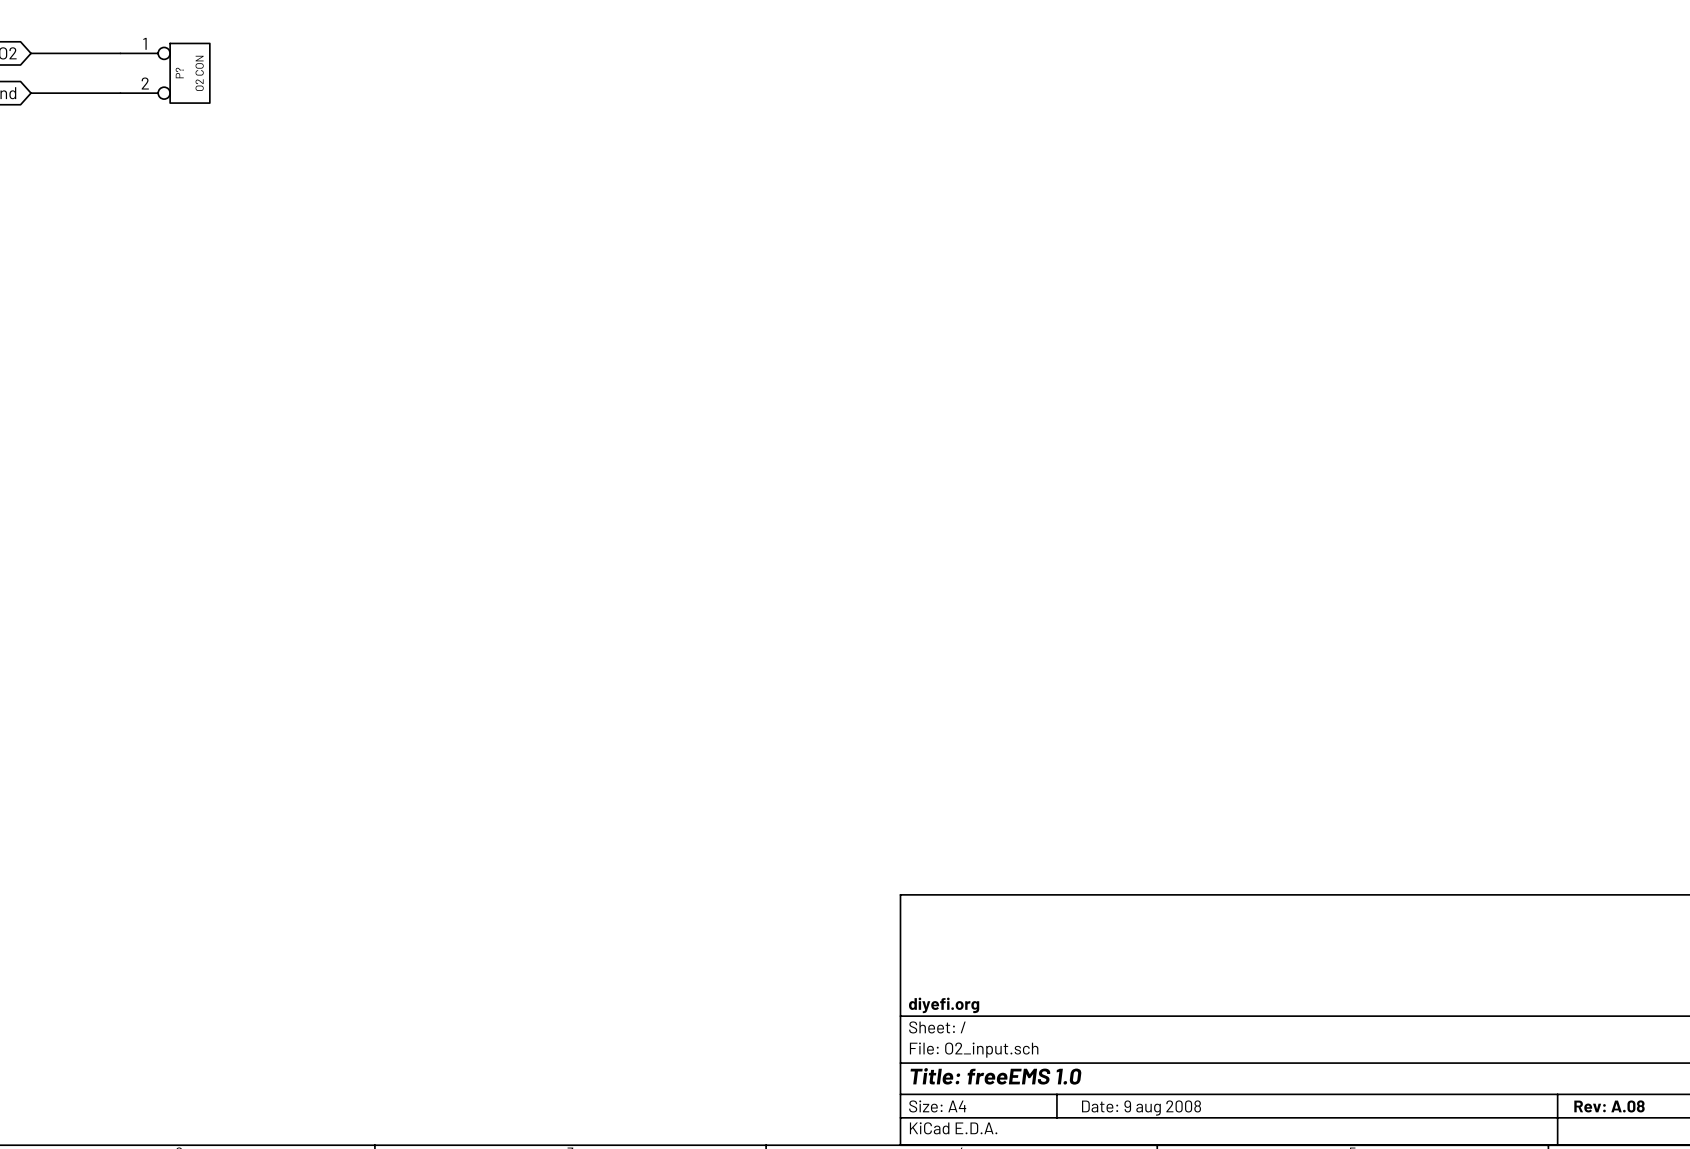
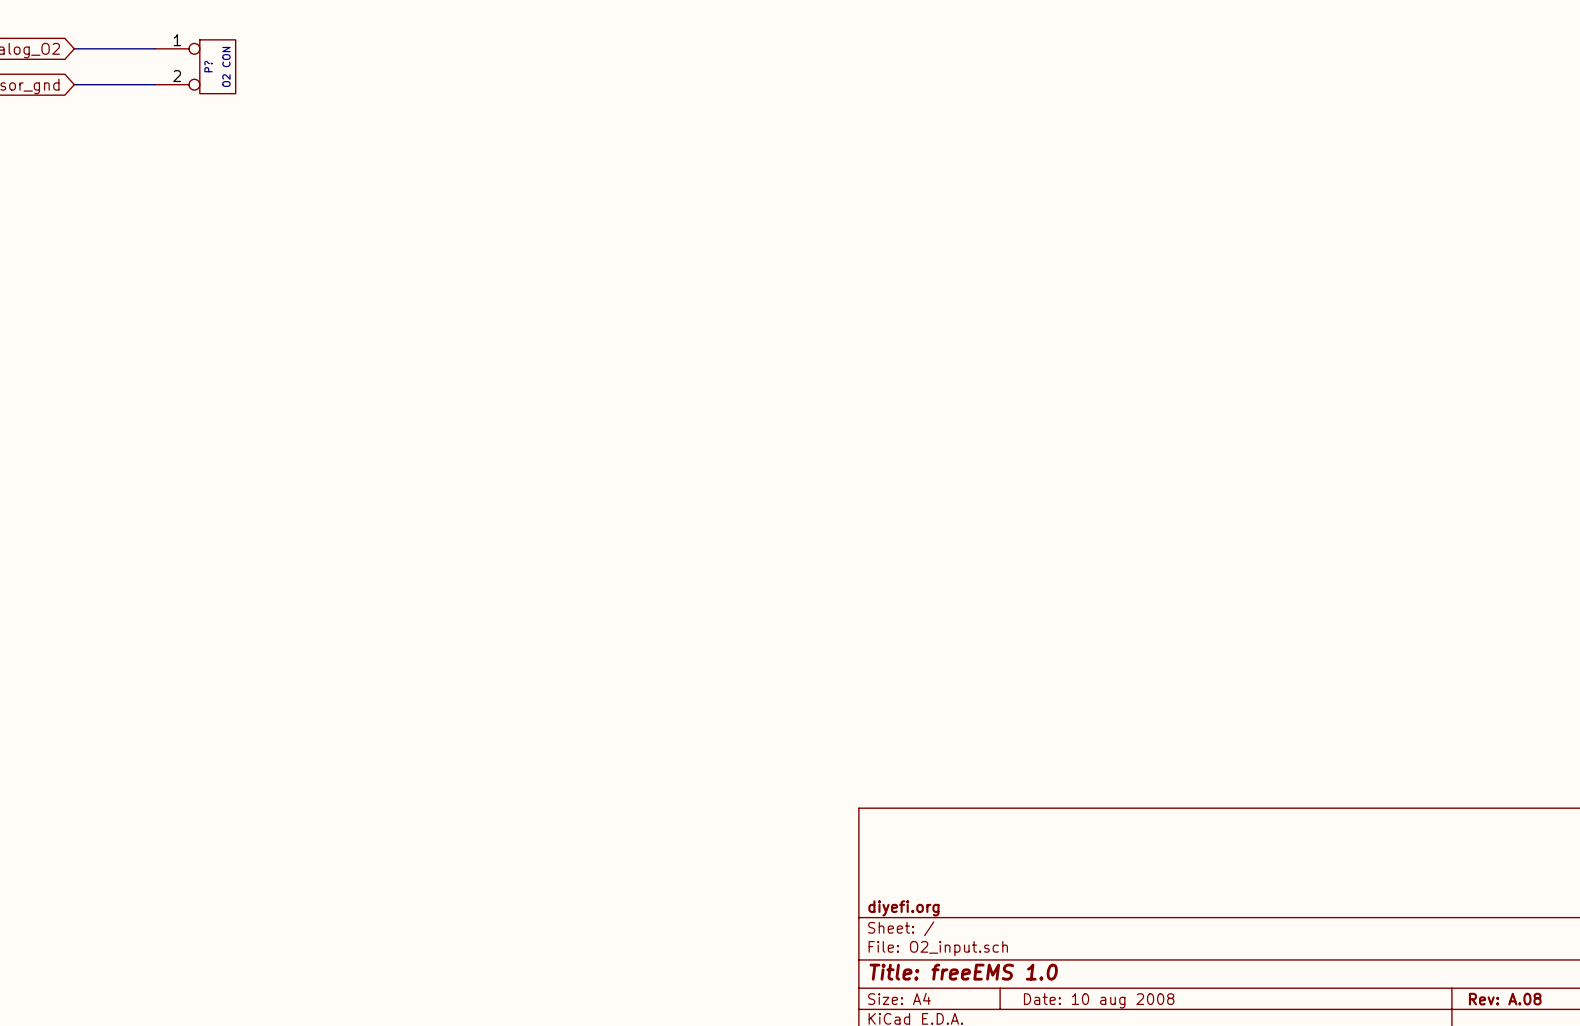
title block: Date: 9 aug 2008 (1141, 1108) -> Date: 10 aug 2008 (1099, 1000)

